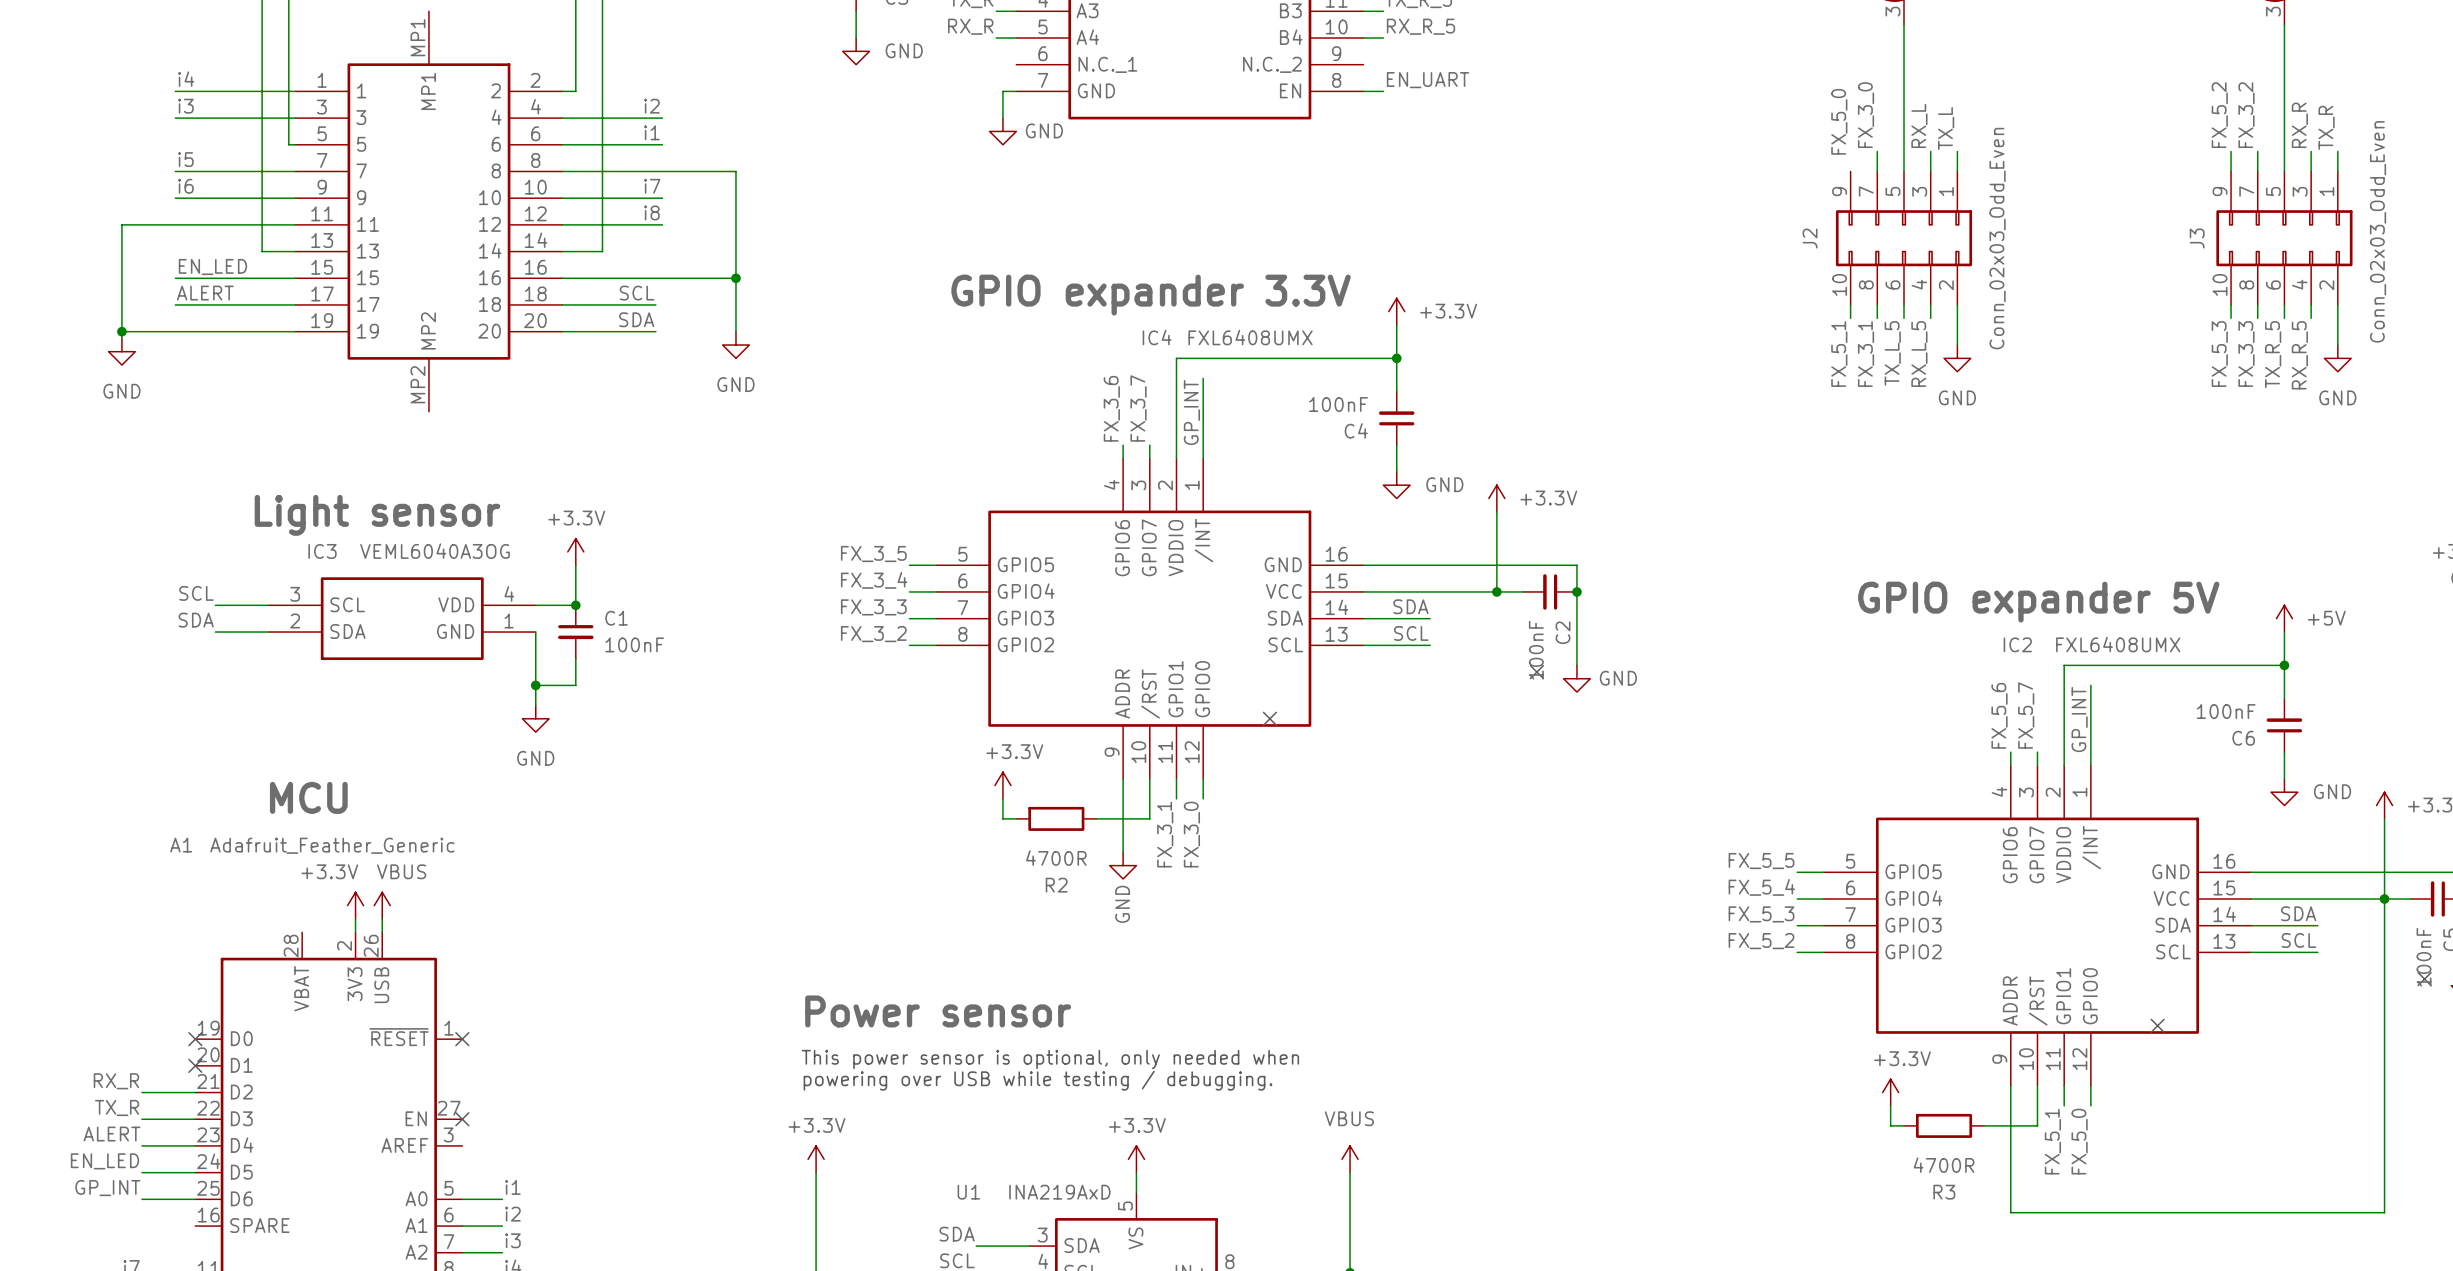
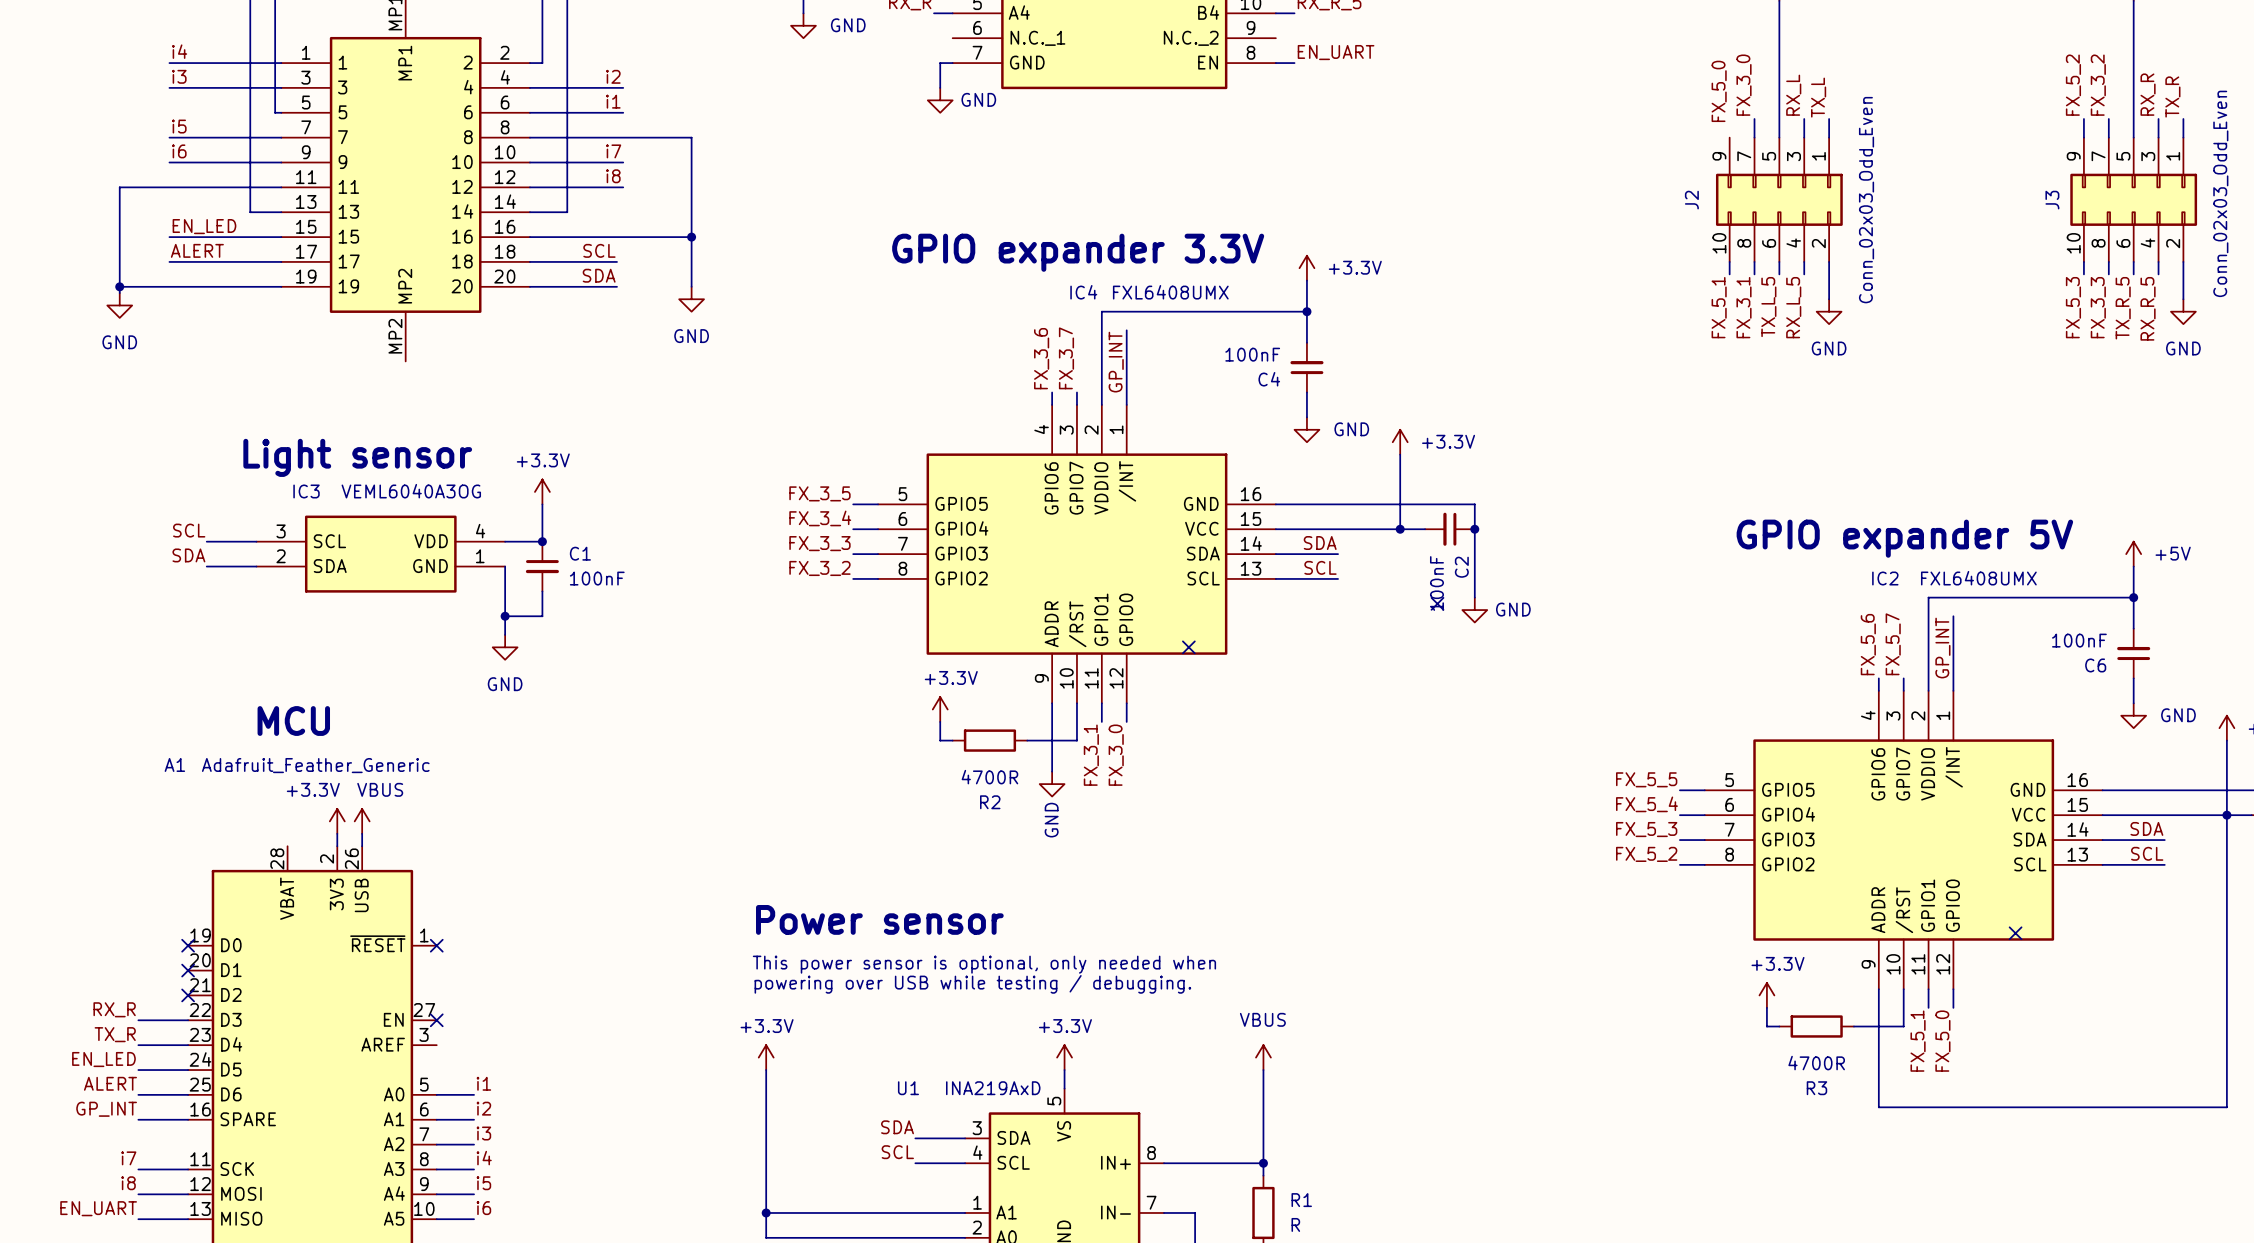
label: RX_R (116, 1081) -> none
wire: (141, 1092) (195, 1092) -> (138, 1119) (188, 1119)
no-connect mark: none -> (188, 995)
label: TX_R (117, 1107) -> RX_R (114, 1009)
label: ALERT (111, 1134) -> TX_R (115, 1034)
label: GP_INT (107, 1188) -> ALERT (110, 1083)
label: none -> GP_INT (106, 1109)

